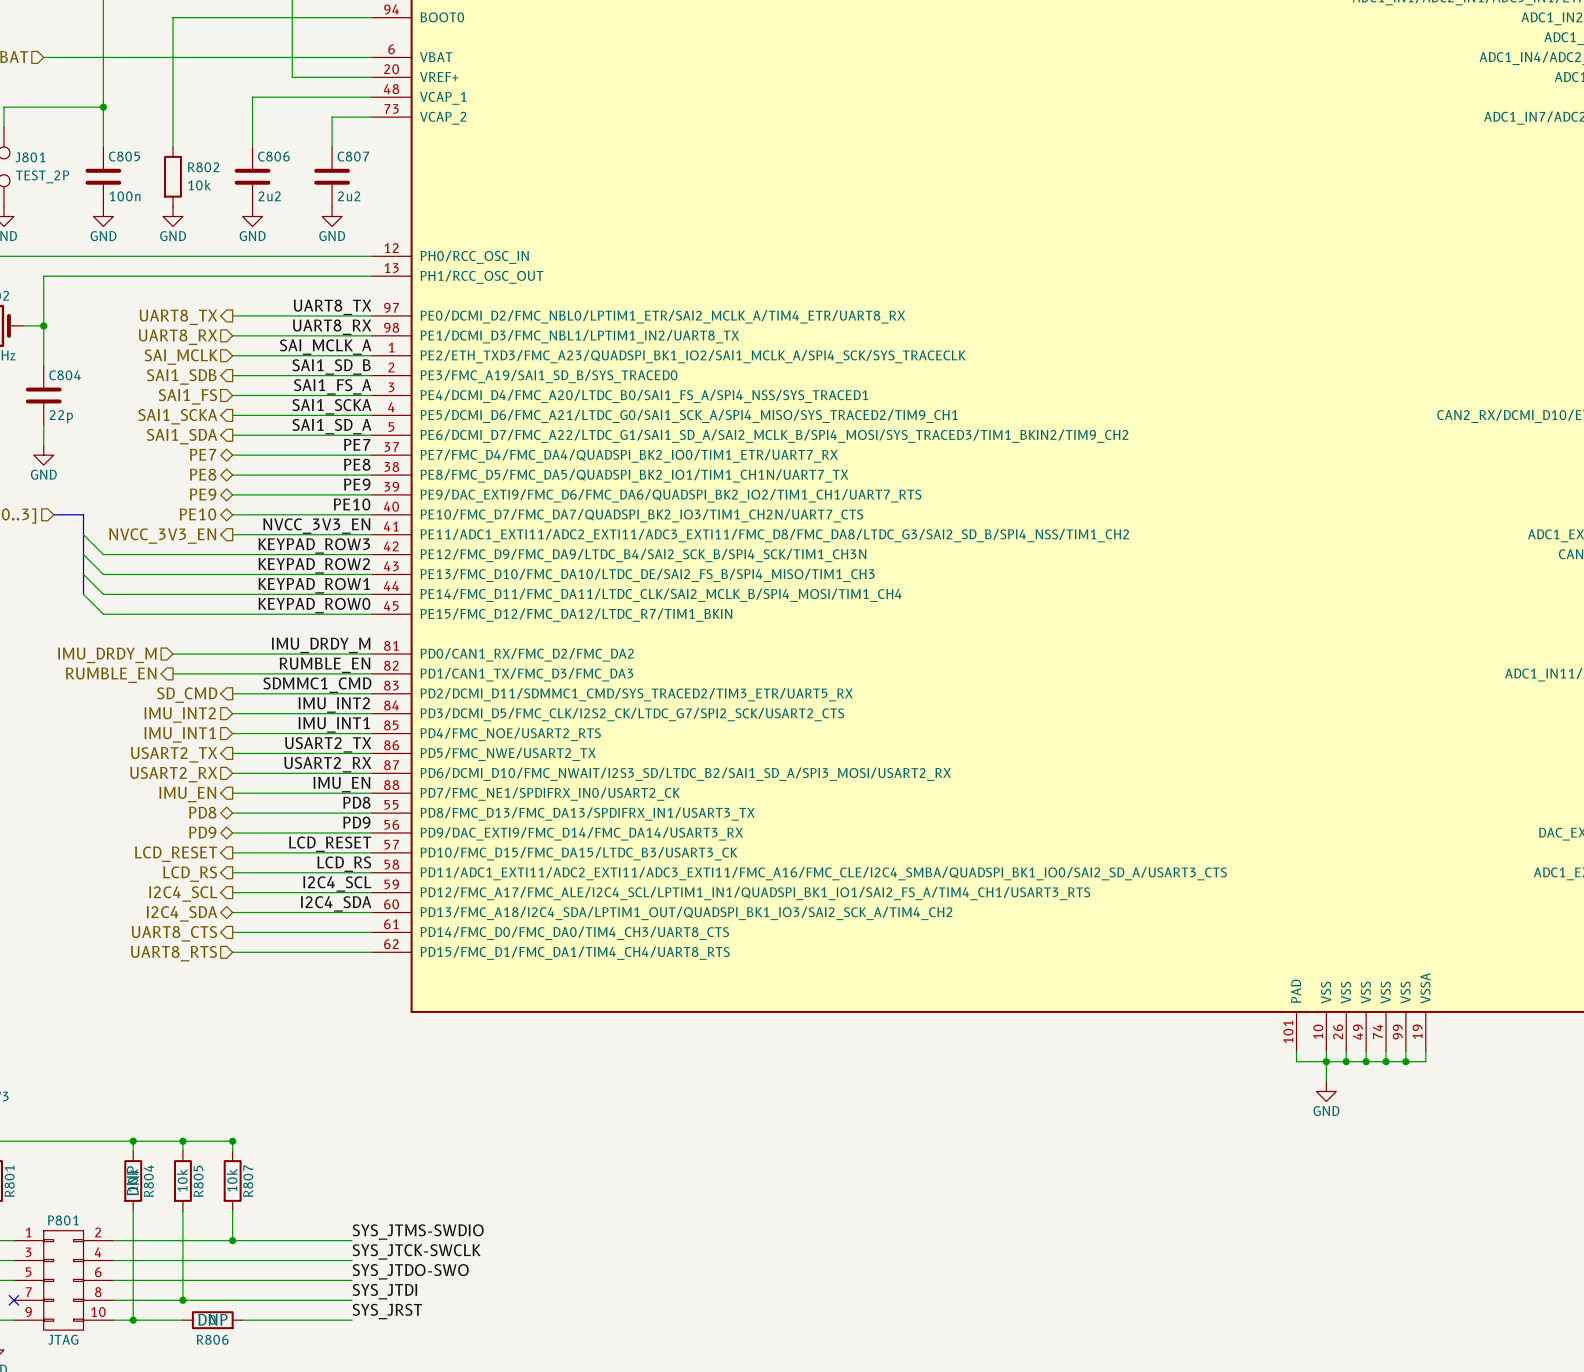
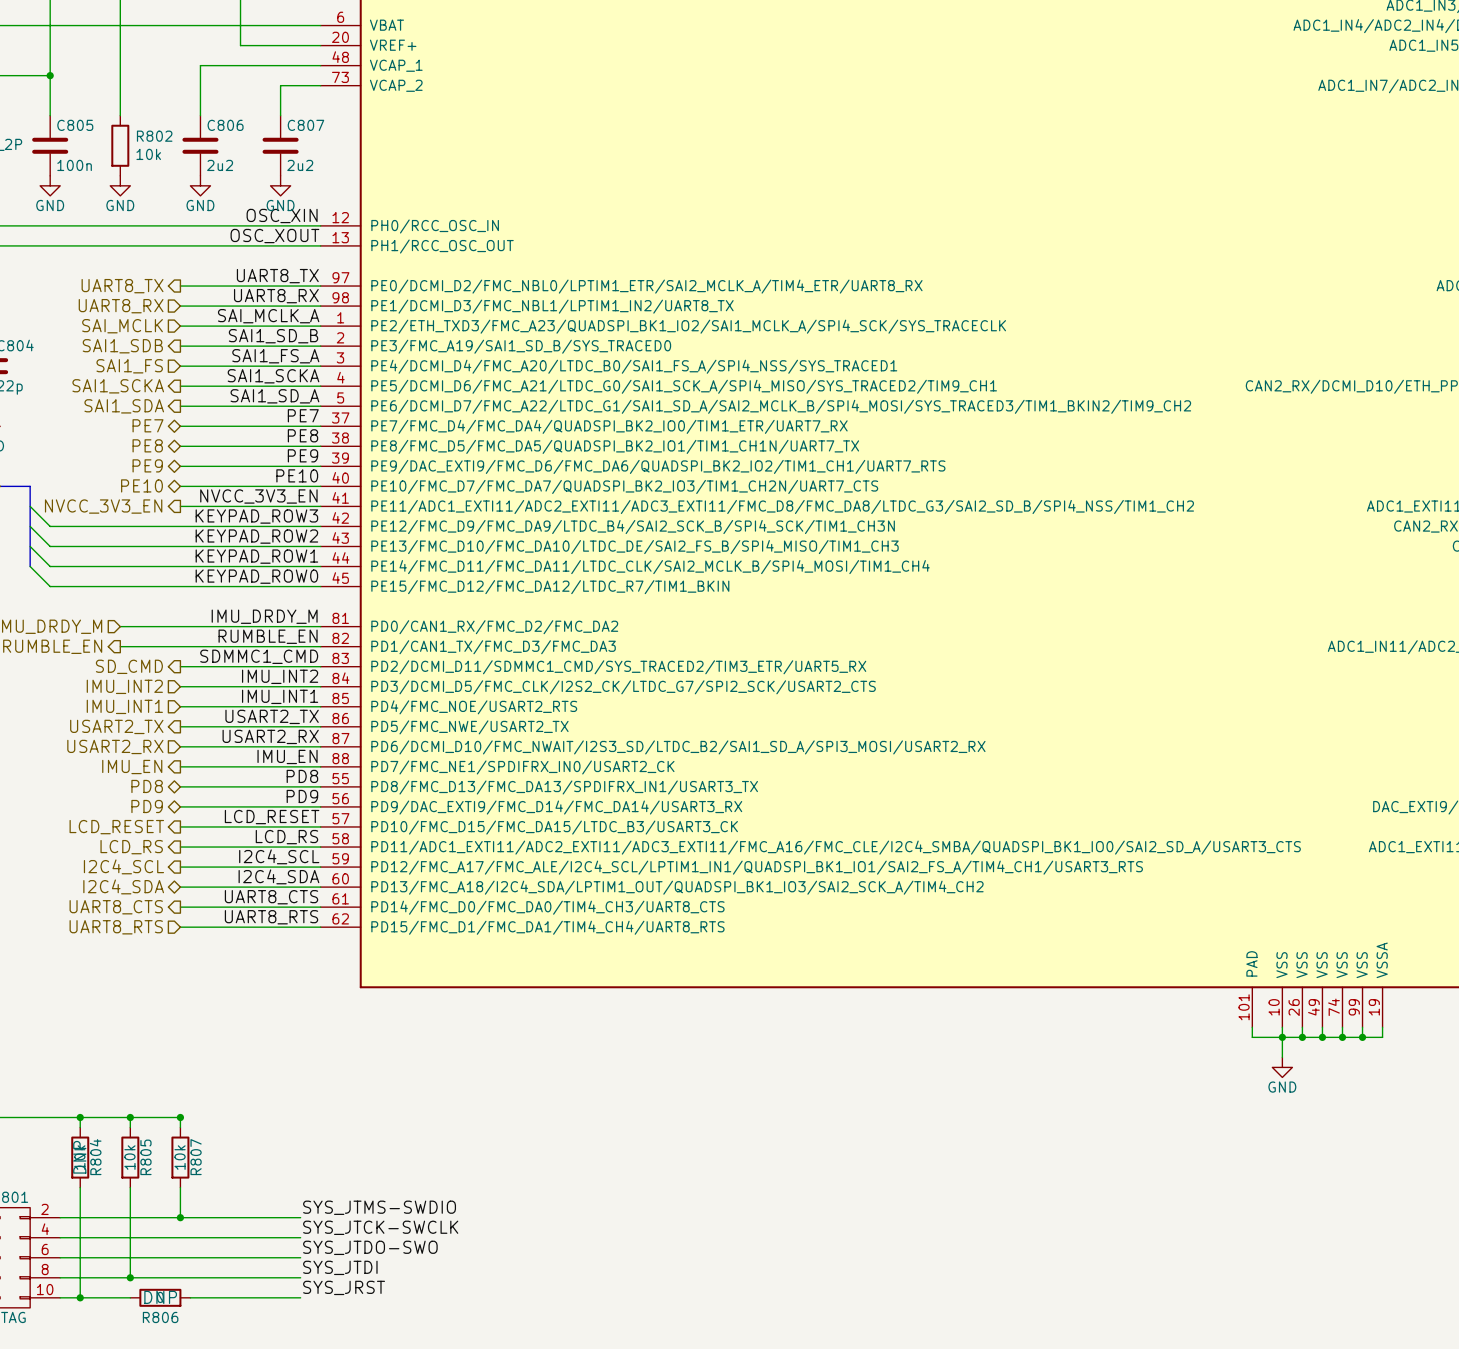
label: none -> OSC_XIN (282, 216)
label: none -> OSC_XOUT (274, 236)
label: none -> UART8_CTS (271, 897)
label: none -> UART8_RTS (271, 917)

